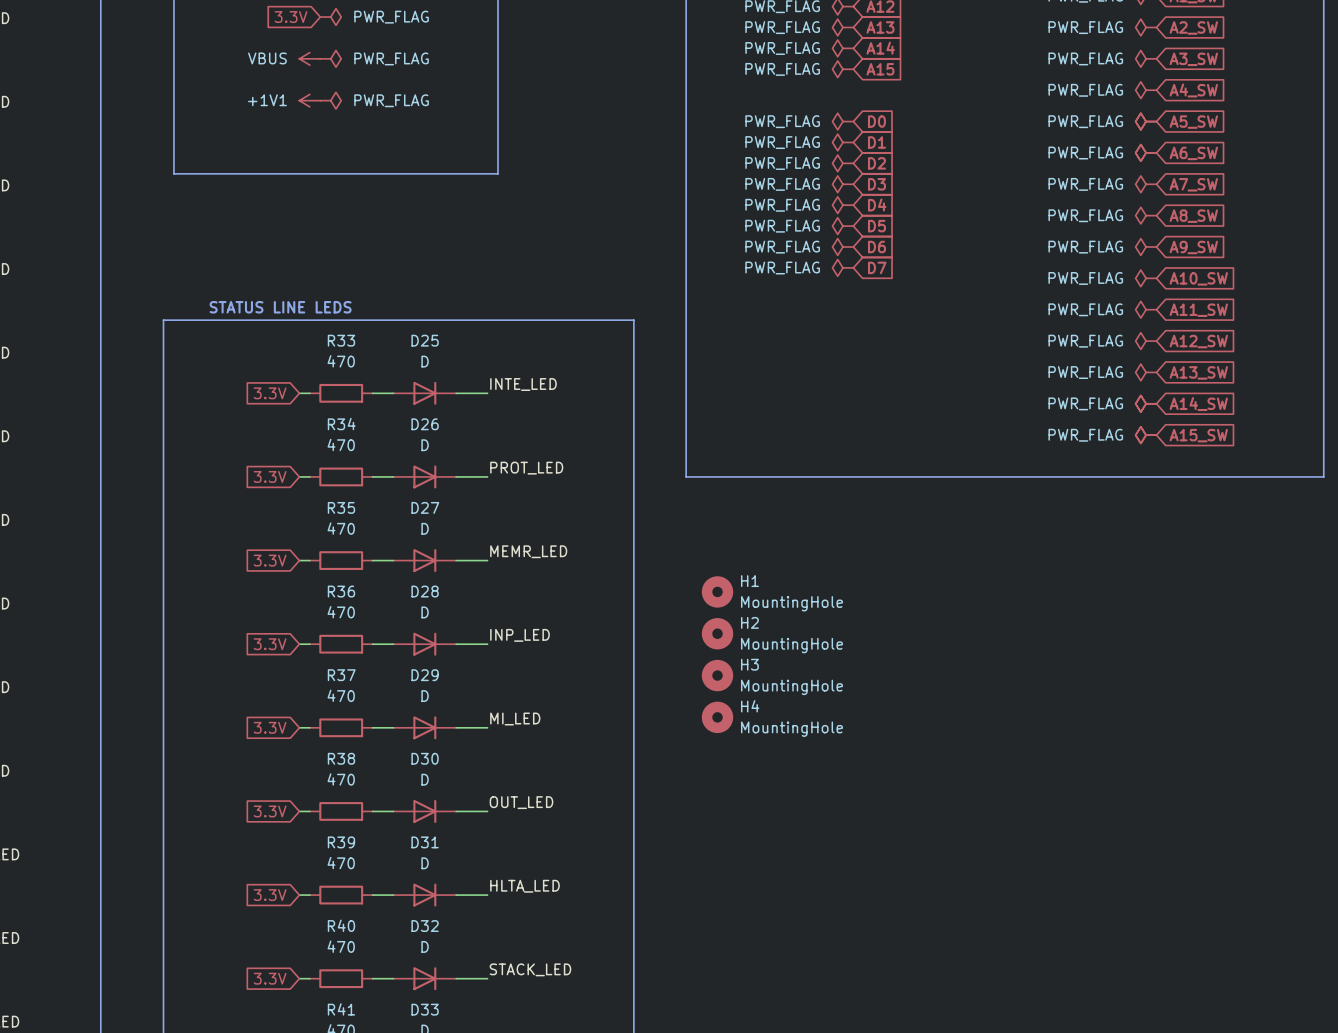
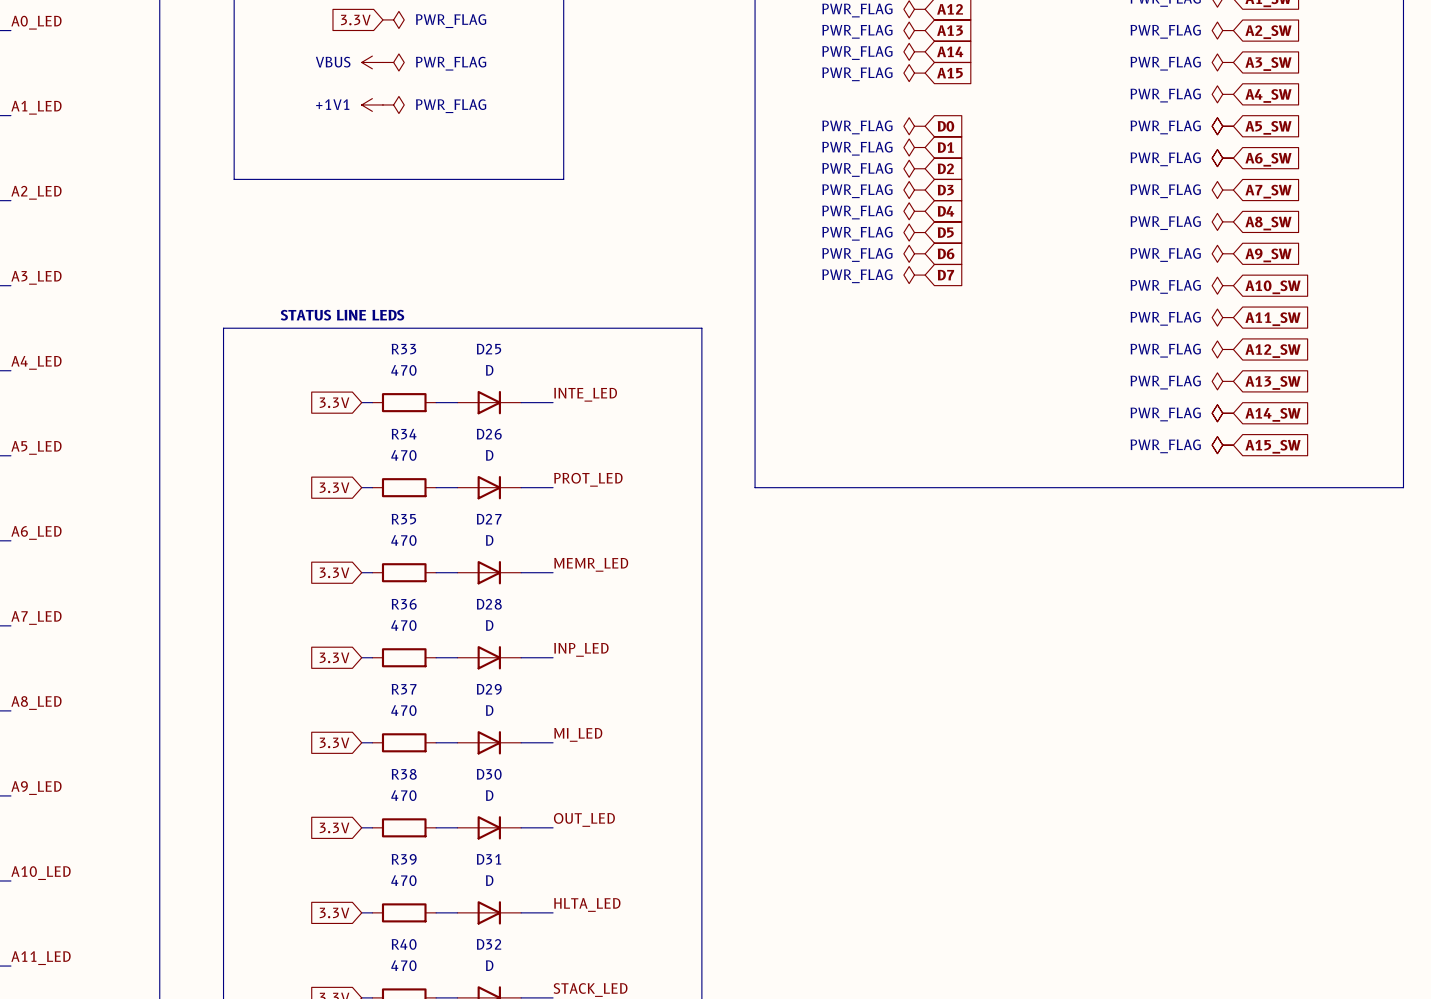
H1: MountingHole (717, 591) -> none
H2: MountingHole (717, 633) -> none
H3: MountingHole (717, 675) -> none
H4: MountingHole (717, 717) -> none

